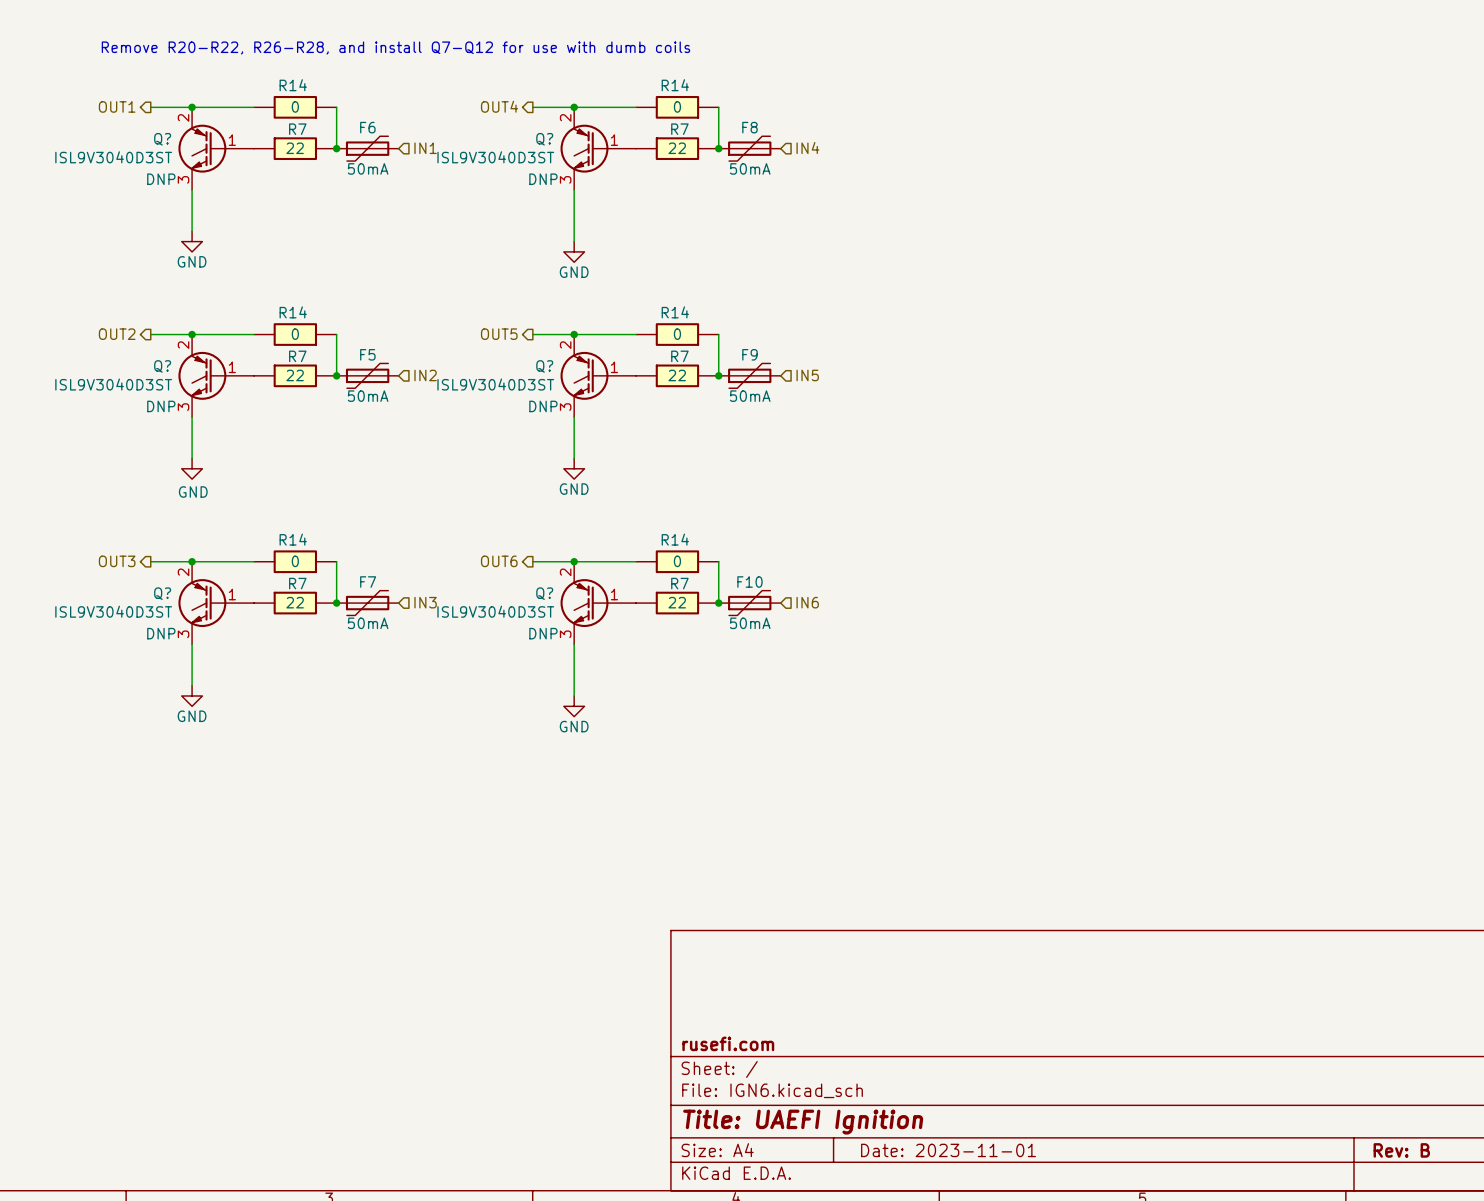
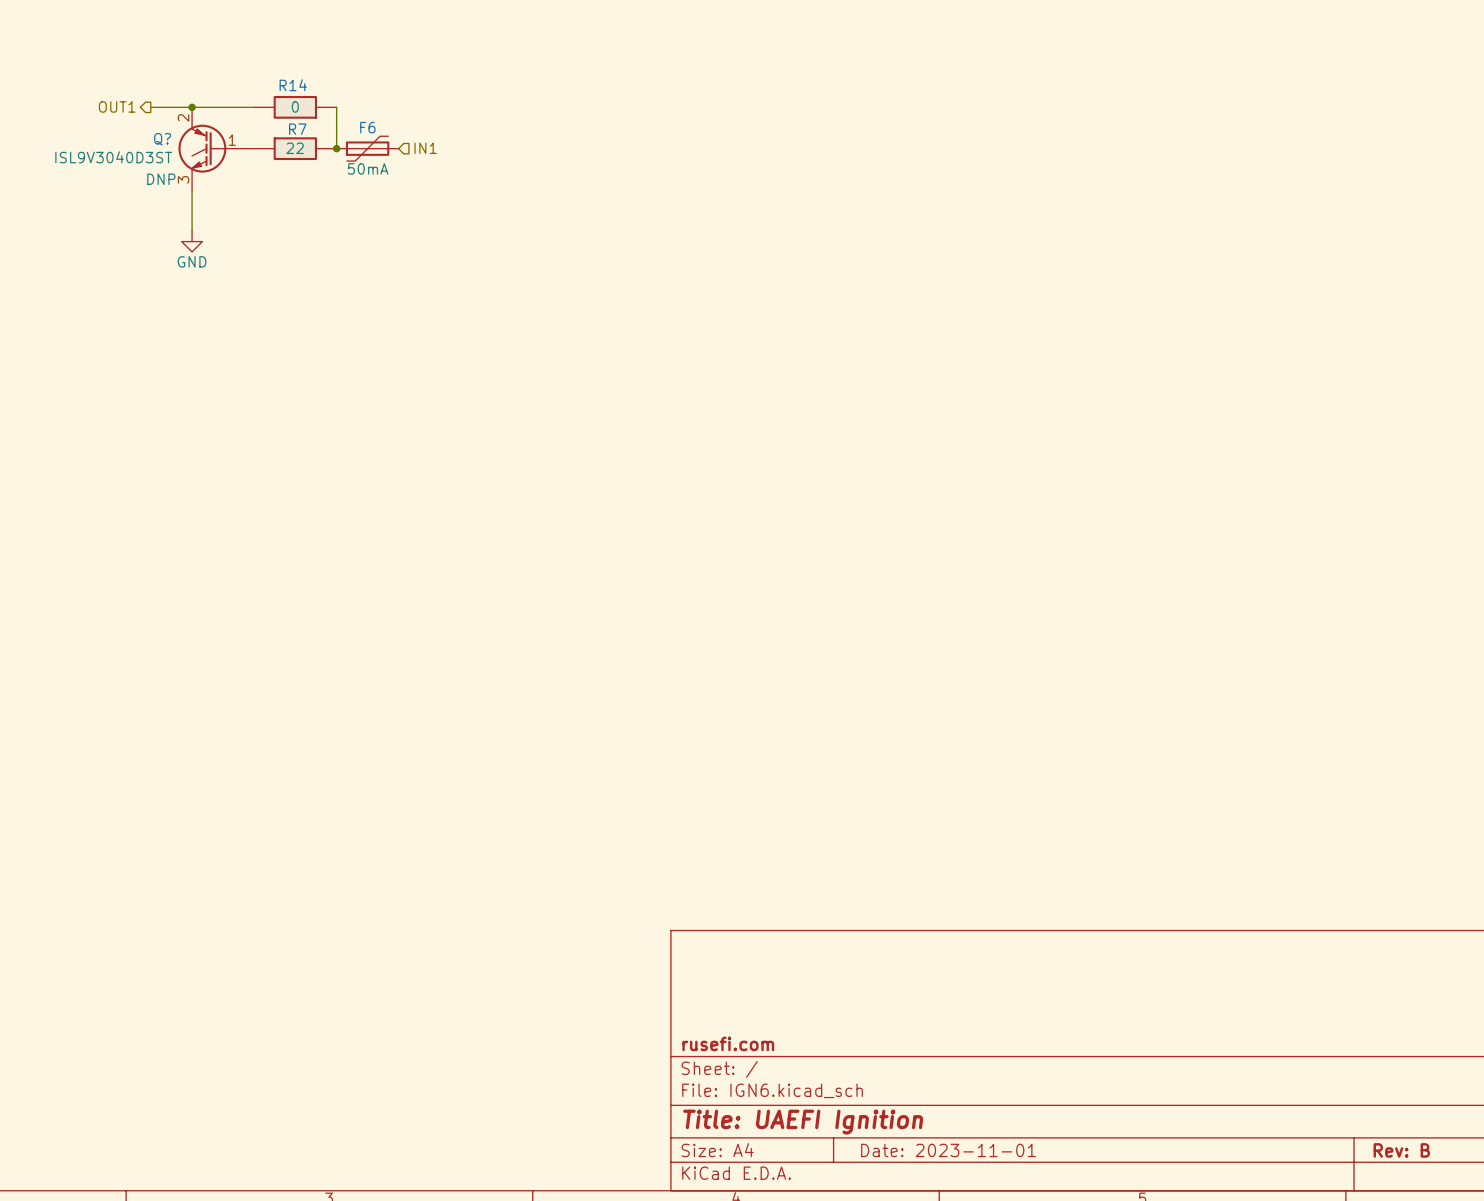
text: Remove R20-R22, R26-R28, and install Q7-Q12 for use with dumb coils (395, 47) -> none
hierarchical label: OUT4 (499, 106) -> none
wire: (532, 107) (636, 107) -> none
junction: (574, 107) -> none
R14: 0 (677, 107) -> none
wire: (718, 107) (718, 148) -> none
Q?: ISL9V3040D3ST (598, 148) -> none
R7: 22 (677, 148) -> none
junction: (718, 148) -> none
F8: 50mA (749, 148) -> none
hierarchical label: IN4 (807, 148) -> none
wire: (574, 189) (574, 241) -> none
power symbol: GND (574, 251) -> none
hierarchical label: OUT2 (117, 334) -> none
wire: (150, 334) (254, 334) -> none
junction: (192, 334) -> none
R14: 0 (295, 334) -> none
wire: (336, 334) (336, 375) -> none
hierarchical label: OUT5 (499, 334) -> none
wire: (532, 334) (636, 334) -> none
junction: (574, 334) -> none
R14: 0 (677, 334) -> none
wire: (718, 334) (718, 375) -> none
Q?: ISL9V3040D3ST (216, 375) -> none
R7: 22 (295, 375) -> none
junction: (336, 375) -> none
F5: 50mA (367, 375) -> none
hierarchical label: IN2 (425, 375) -> none
Q?: ISL9V3040D3ST (598, 375) -> none
R7: 22 (677, 375) -> none
junction: (718, 375) -> none
F9: 50mA (749, 375) -> none
hierarchical label: IN5 (807, 375) -> none
wire: (192, 417) (192, 458) -> none
wire: (574, 417) (574, 458) -> none
power symbol: GND (192, 468) -> none
power symbol: GND (574, 468) -> none
hierarchical label: OUT3 (117, 561) -> none
wire: (150, 561) (254, 561) -> none
junction: (192, 561) -> none
R14: 0 (295, 561) -> none
wire: (336, 561) (336, 603) -> none
hierarchical label: OUT6 (499, 561) -> none
wire: (532, 561) (636, 561) -> none
junction: (574, 561) -> none
R14: 0 (677, 561) -> none
wire: (718, 561) (718, 603) -> none
hierarchical label: IN3 (425, 602) -> none
hierarchical label: IN6 (807, 602) -> none
Q?: ISL9V3040D3ST (216, 603) -> none
R7: 22 (295, 603) -> none
junction: (336, 603) -> none
F7: 50mA (367, 603) -> none
Q?: ISL9V3040D3ST (598, 603) -> none
R7: 22 (677, 603) -> none
junction: (718, 603) -> none
F10: 50mA (749, 603) -> none
wire: (192, 644) (192, 685) -> none
wire: (574, 644) (574, 696) -> none
power symbol: GND (192, 696) -> none
power symbol: GND (574, 706) -> none

